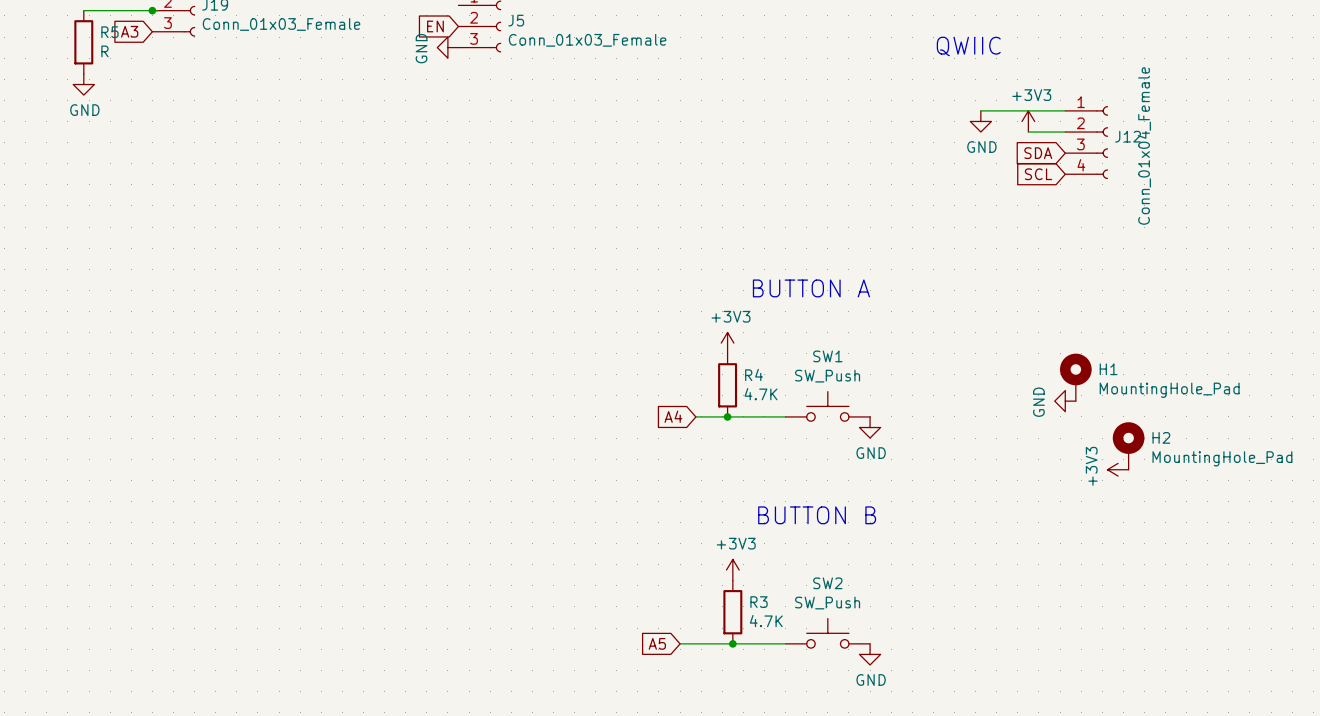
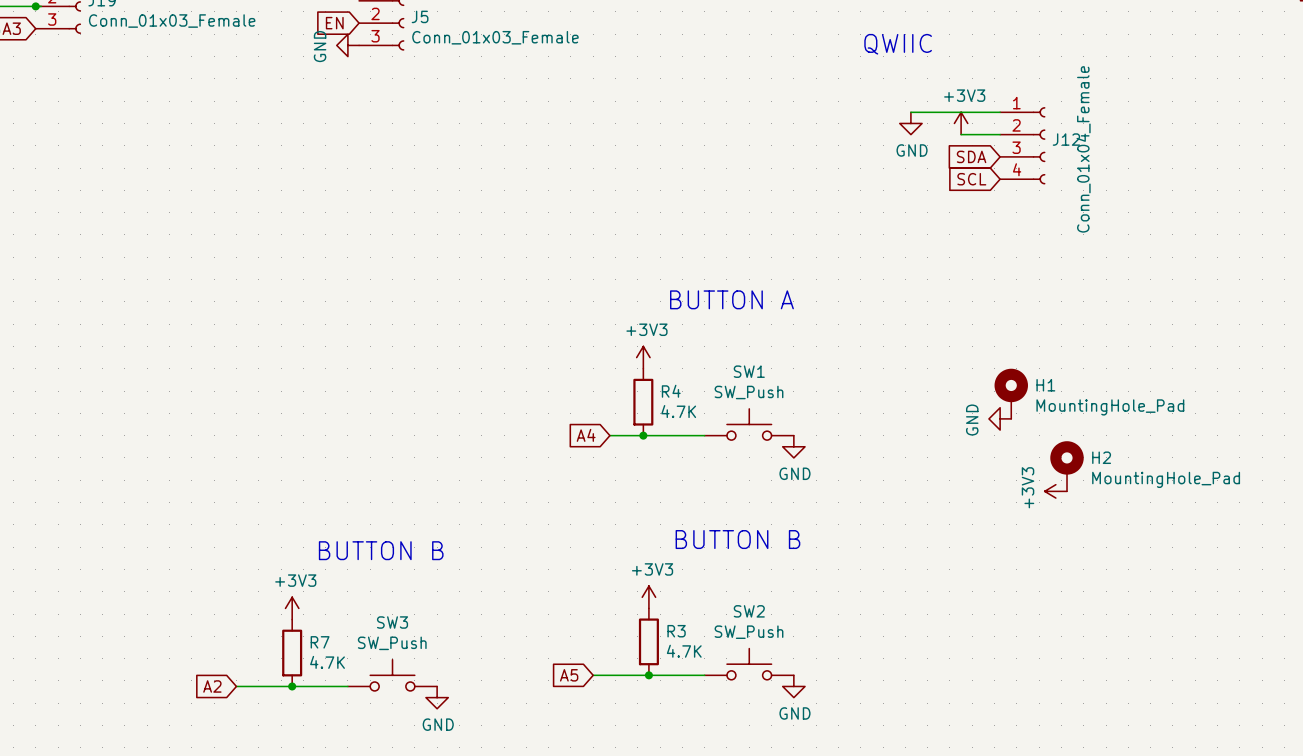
text: none -> BUTTON B (381, 550)
power symbol: none -> +3V3 (292, 608)
R7: none -> 4.7K (292, 653)
SW3: none -> SW_Push (392, 675)
global label: none -> A2 (212, 686)
wire: none -> (236, 686) (347, 686)
junction: none -> (292, 686)
power symbol: none -> GND (437, 697)

